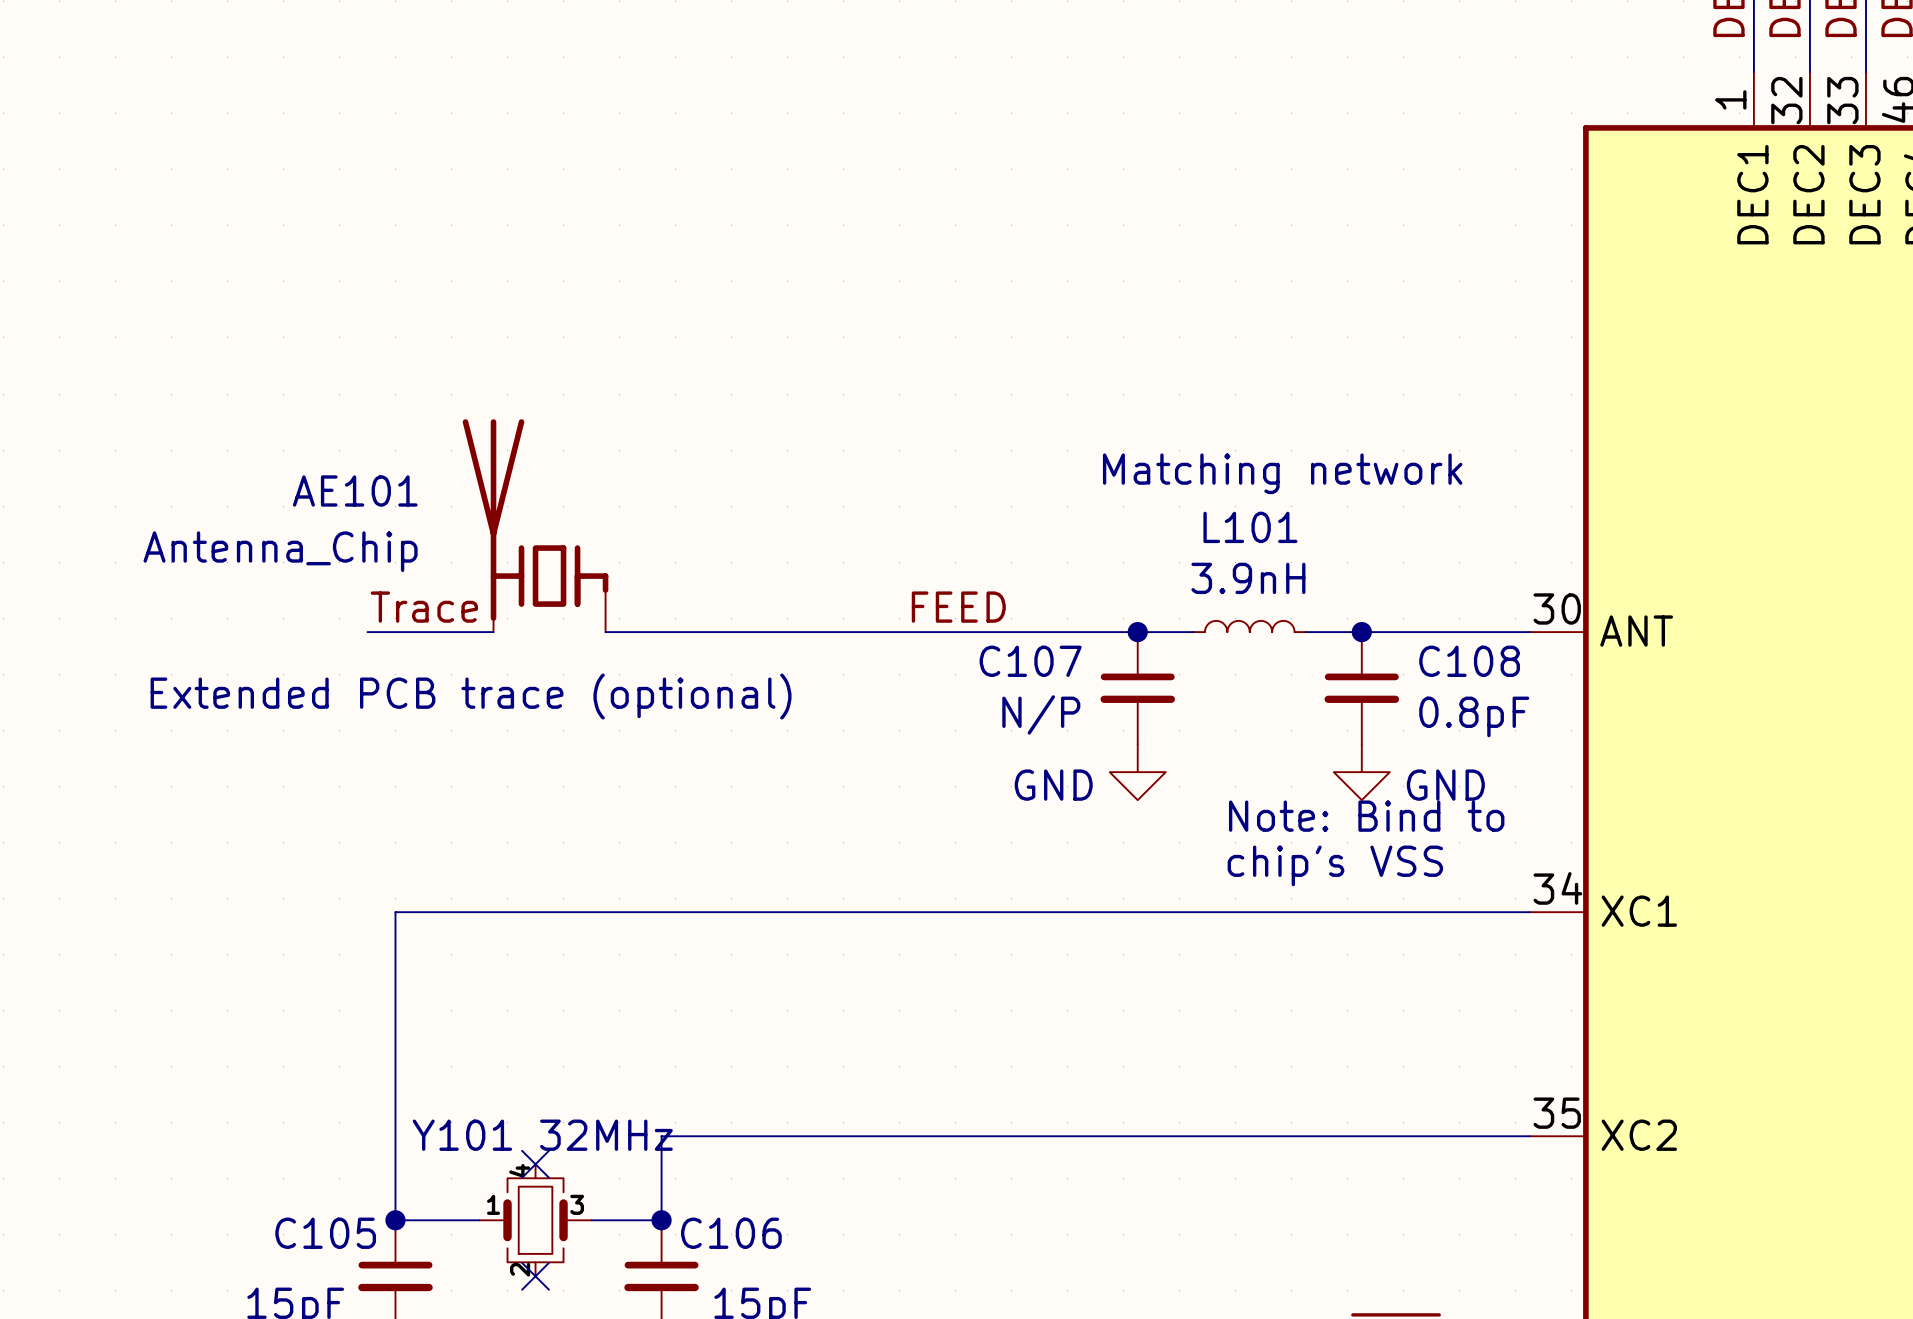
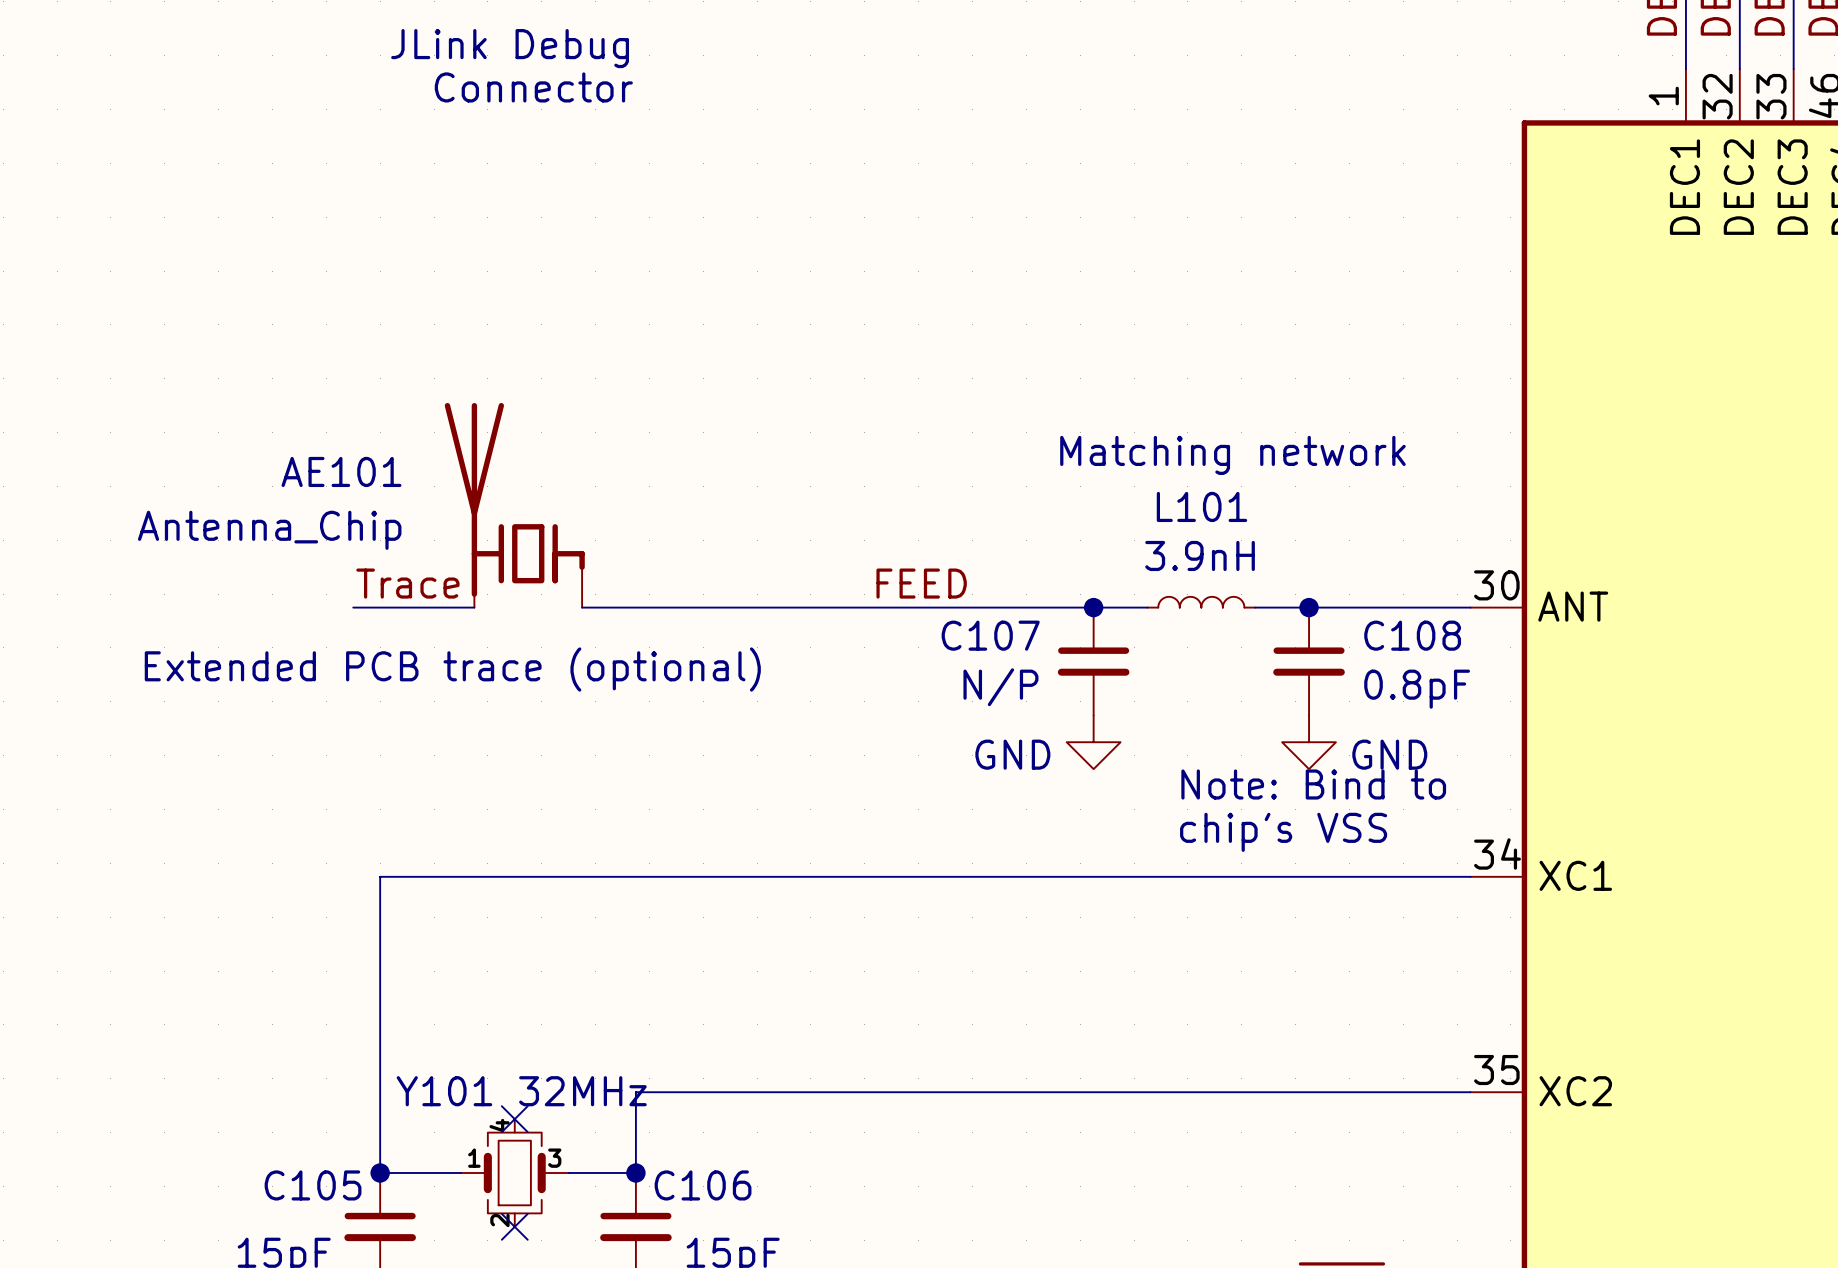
text: none -> JLink Debug (510, 48)
text: none -> Connector (533, 87)

